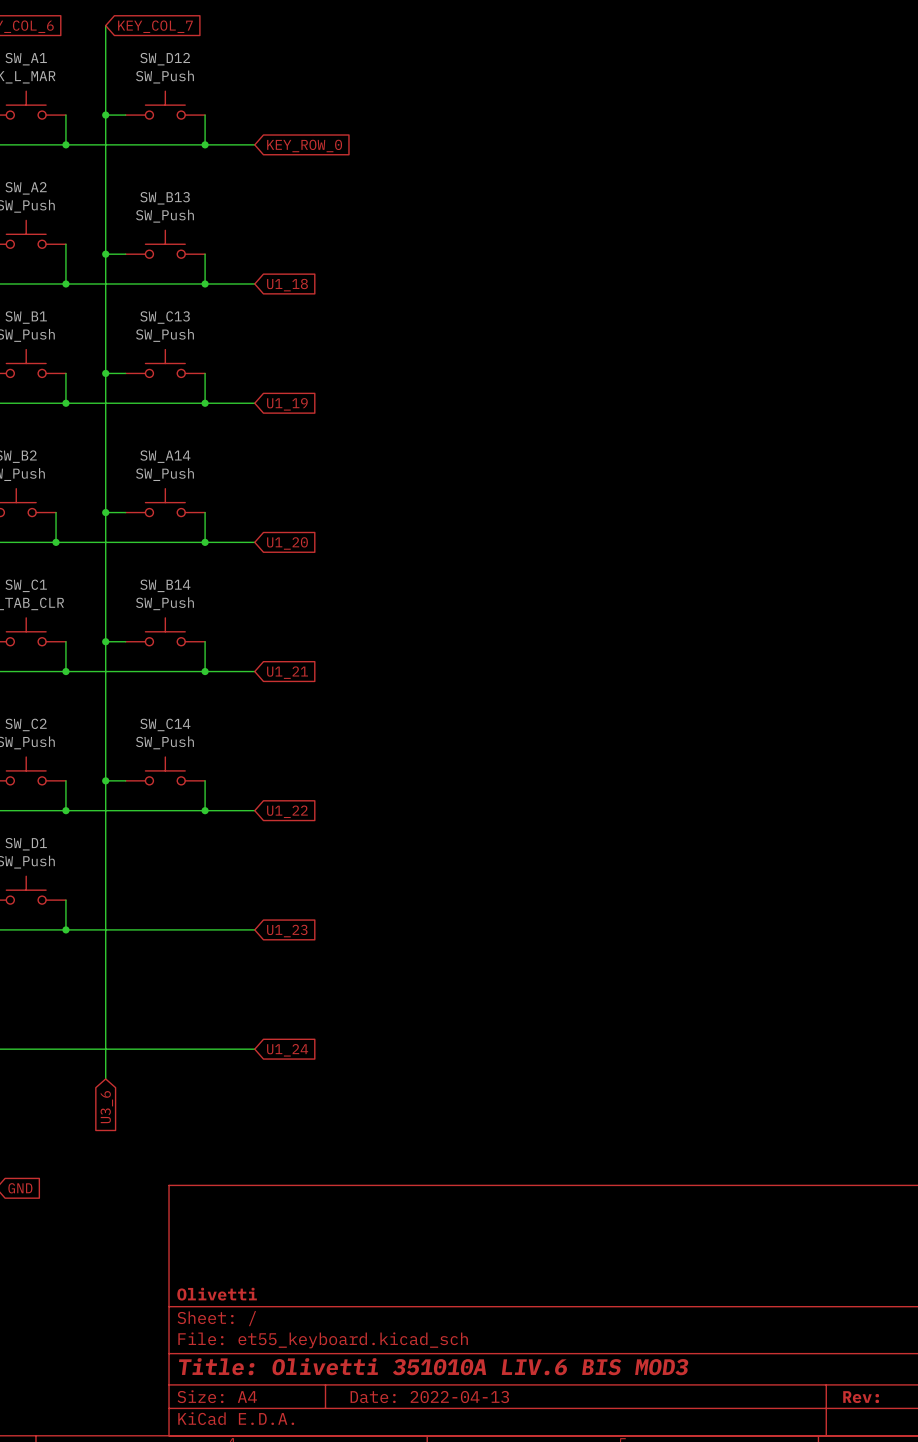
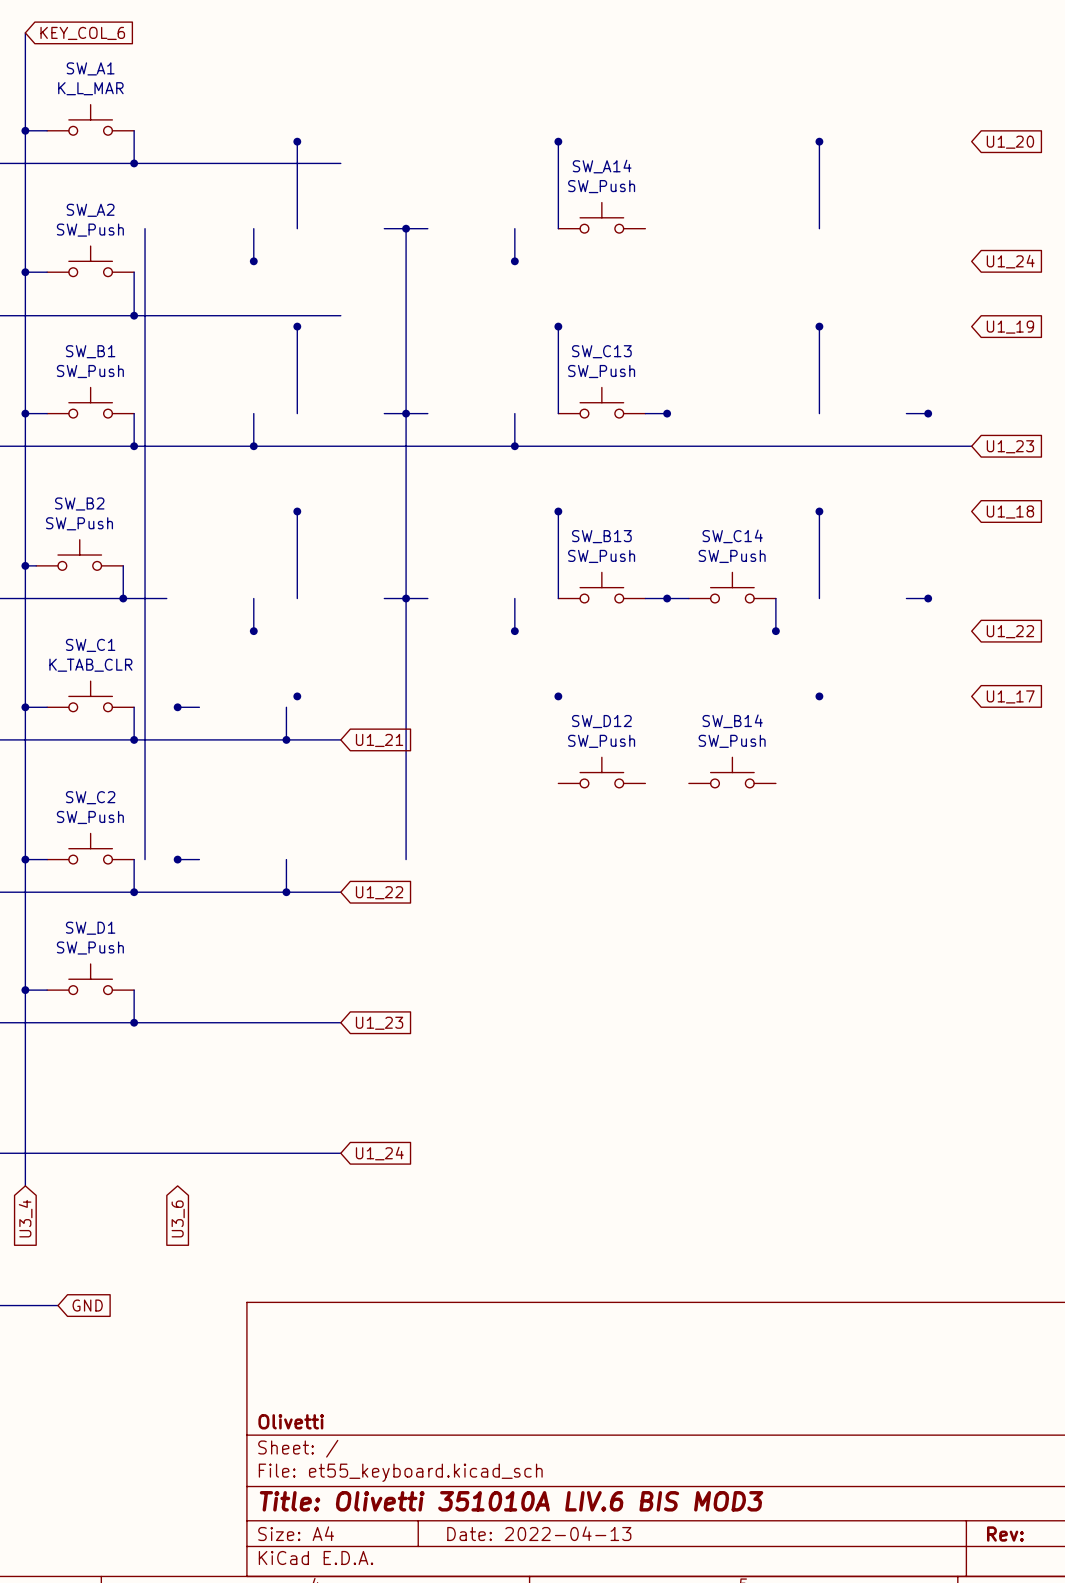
wire: (105, 25) (105, 1078) -> none
global label: KEY_COL_7 (155, 26) -> none
SW_D12 position: (165, 105) -> (601, 772)
wire: (105, 115) (125, 115) -> none
junction: (105, 115) -> none
wire: (205, 115) (205, 144) -> none
wire: none -> (297, 141) (297, 228)
wire: none -> (558, 141) (558, 228)
junction: none -> (558, 141)
wire: none -> (819, 141) (819, 228)
junction: none -> (819, 141)
global label: none -> U1_20 (1010, 142)
junction position: (205, 144) -> (297, 141)
global label: KEY_ROW_0 (304, 145) -> none
wire: none -> (145, 228) (145, 859)
wire: none -> (384, 228) (427, 228)
wire: none -> (406, 228) (406, 859)
junction: none -> (406, 228)
wire: none -> (514, 228) (514, 261)
junction: none -> (253, 261)
junction: none -> (514, 261)
global label: none -> U1_24 (1010, 261)
SW_B13 position: (165, 244) -> (601, 587)
wire: (105, 254) (125, 254) -> none
junction: (105, 254) -> none
wire: (205, 254) (205, 284) -> (253, 228) (253, 261)
junction position: (205, 284) -> (297, 326)
global label: U1_18 (287, 285) -> none
wire: none -> (297, 326) (297, 413)
wire: none -> (558, 326) (558, 413)
junction: none -> (558, 326)
wire: none -> (819, 326) (819, 413)
junction: none -> (819, 326)
global label: none -> U1_19 (1010, 327)
SW_C13 position: (165, 363) -> (601, 402)
wire: (105, 373) (125, 373) -> none
junction: (105, 373) -> none
wire: (205, 373) (205, 403) -> (253, 413) (253, 446)
wire: none -> (384, 413) (427, 413)
junction: none -> (406, 413)
wire: none -> (514, 413) (514, 446)
wire: none -> (645, 413) (667, 413)
junction: none -> (667, 413)
wire: none -> (906, 413) (928, 413)
junction: none -> (928, 413)
junction position: (205, 403) -> (253, 446)
wire: none -> (340, 446) (971, 446)
junction: none -> (514, 446)
global label: U1_19 (287, 404) -> none
global label: none -> U1_23 (1010, 446)
wire: none -> (297, 511) (297, 598)
junction: none -> (297, 511)
wire: none -> (558, 511) (558, 598)
junction: none -> (558, 511)
wire: none -> (819, 511) (819, 598)
junction: none -> (819, 511)
global label: none -> U1_18 (1010, 512)
SW_A14 position: (165, 502) -> (601, 217)
wire: (105, 512) (125, 512) -> none
junction: (105, 512) -> none
wire: (205, 512) (205, 542) -> (253, 598) (253, 631)
wire: (95, 542) (254, 542) -> none
junction: (205, 542) -> none
wire: none -> (384, 598) (427, 598)
junction: none -> (406, 598)
wire: none -> (514, 598) (514, 631)
wire: none -> (645, 598) (688, 598)
junction: none -> (667, 598)
wire: none -> (775, 598) (775, 631)
wire: none -> (906, 598) (928, 598)
junction: none -> (928, 598)
global label: U1_20 (287, 543) -> none
junction: none -> (253, 631)
junction: none -> (514, 631)
junction: none -> (775, 631)
global label: none -> U1_22 (1010, 631)
SW_B14 position: (165, 631) -> (732, 772)
junction: none -> (297, 696)
junction: none -> (558, 696)
junction: none -> (819, 696)
global label: none -> U1_17 (1010, 696)
SW_C14 position: (165, 770) -> (732, 587)

